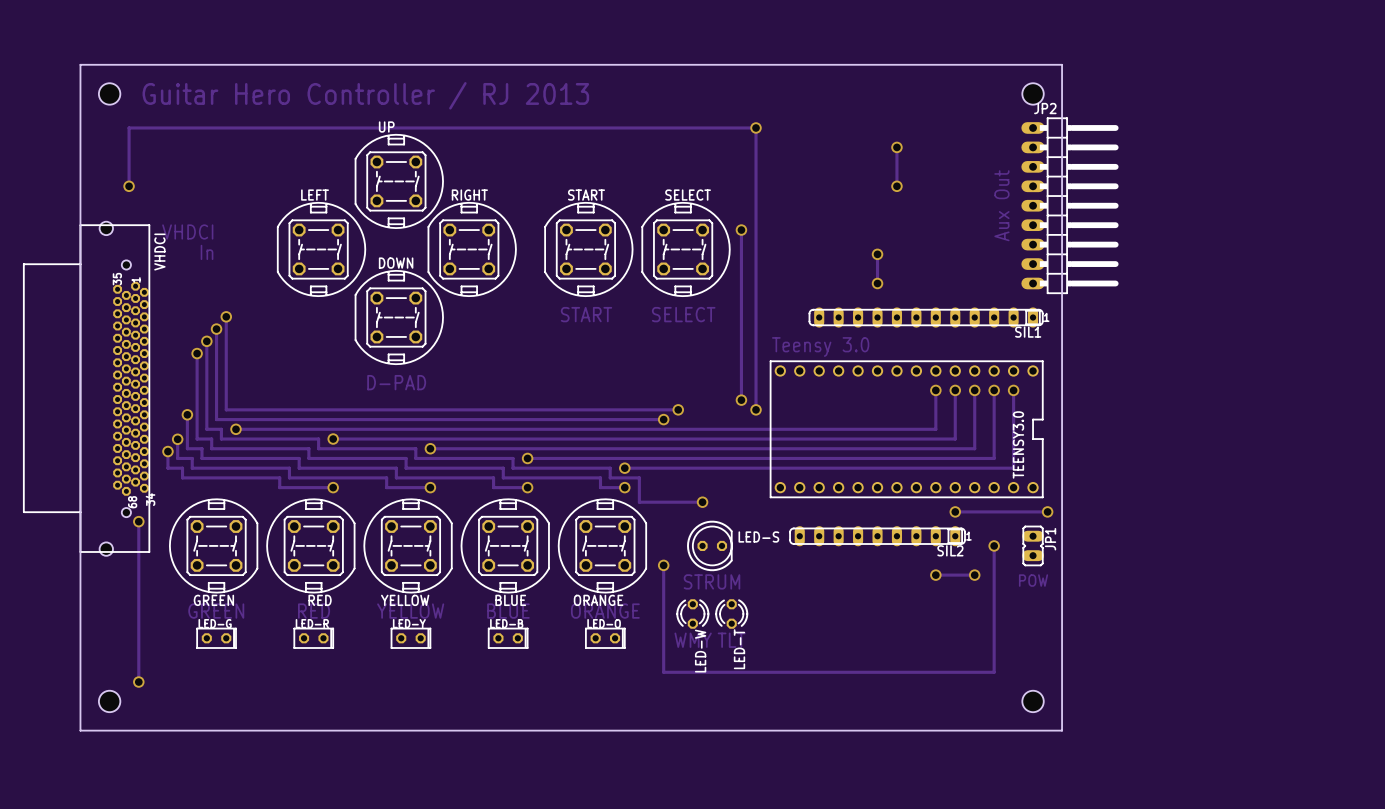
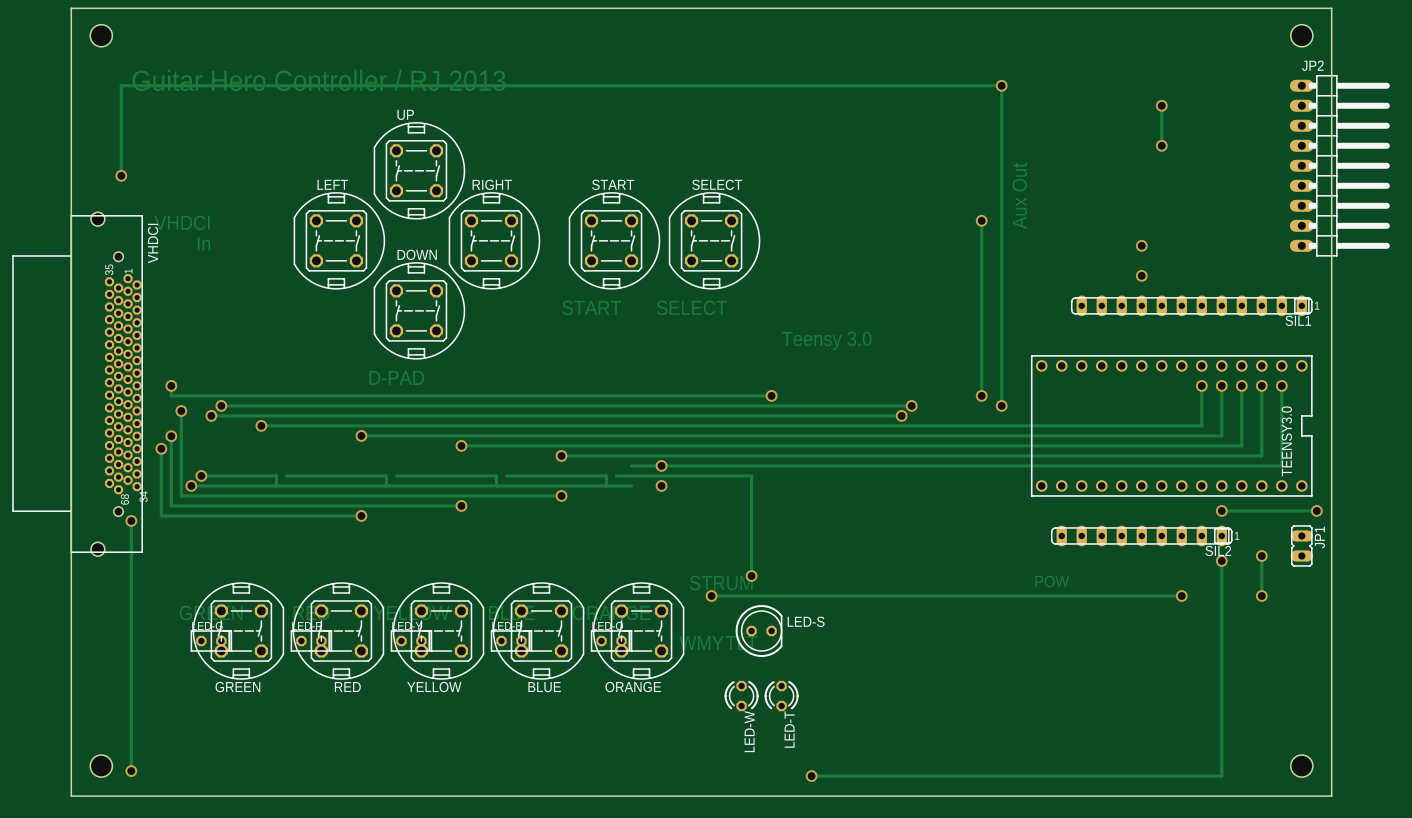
hole: none -> (1301, 35)
board edge: (80, 64) (1062, 64) (1062, 730) (80, 730) -> (71, 50) (71, 8) (1331, 8) (1331, 796) (71, 796) (71, 736)
hole position: (109, 93) -> (101, 35)
hole: (1033, 93) -> none
via: none -> (1001, 85)
track: none -> (1161, 105) (1161, 145)
via: none -> (1161, 105)
track: (129, 127) (756, 127) (756, 409) -> (121, 115) (121, 85) (1001, 85) (1001, 405)
via: (756, 127) -> none
track: (896, 147) (896, 186) -> none
via: (896, 147) -> none
via: none -> (1161, 145)
UP position: (399, 181) -> (419, 170)
via: (896, 186) -> none
JP2 position: (1069, 205) -> (1339, 165)
track: (741, 230) (741, 400) -> none
via: (741, 230) -> none
track: none -> (981, 220) (981, 395)
via: none -> (981, 220)
LEFT position: (321, 249) -> (339, 240)
RIGHT position: (472, 249) -> (494, 240)
START position: (588, 249) -> (614, 240)
SELECT position: (686, 249) -> (714, 240)
track: (877, 254) (877, 283) -> none
via: (877, 254) -> none
via: none -> (1141, 245)
via: (877, 283) -> none
via: none -> (1141, 275)
track: (226, 316) (226, 409) -> none
via: (226, 316) -> none
DOWN position: (399, 317) -> (419, 310)
SIL1 position: (926, 317) -> (1191, 305)
track: (216, 329) (216, 419) -> none
via: (216, 329) -> none
track: (206, 341) (206, 429) (221, 429) (221, 439) (318, 439) (318, 448) (415, 448) (415, 458) (513, 458) (513, 468) (610, 468) (610, 477) -> none
via: (206, 341) -> none
track: (197, 353) (197, 439) (211, 439) (211, 448) (308, 448) (308, 458) (406, 458) (406, 468) (503, 468) (503, 477) -> none
via: (197, 353) -> none
track: none -> (171, 385) (171, 395) (771, 395)
via: none -> (171, 385)
track: (935, 390) (935, 429) -> (1201, 385) (1201, 425) (951, 425)
via: (935, 390) -> none
track: (955, 390) (955, 439) -> (1221, 385) (1221, 435) (971, 435)
via: (955, 390) -> none
track: (974, 390) (974, 448) -> (1241, 385) (1241, 445) (991, 445)
via: (974, 390) -> none
track: (994, 390) (994, 458) -> (1261, 385) (1261, 455) (1011, 455)
via: (994, 390) -> none
track: (1013, 390) (1013, 468) -> (1281, 385) (1281, 465) (1031, 465)
via: (1013, 390) -> none
via: none -> (1201, 385)
via: none -> (1221, 385)
via: none -> (1241, 385)
via: none -> (1261, 385)
via: none -> (1281, 385)
via: (741, 400) -> none
via: none -> (771, 395)
via: none -> (981, 395)
via: none -> (221, 405)
track: none -> (686, 405) (911, 405)
via: (678, 409) -> none
via: (756, 409) -> none
via: none -> (911, 405)
via: none -> (1001, 405)
via: none -> (211, 415)
track: none -> (671, 415) (901, 415)
via: (663, 419) -> none
via: none -> (901, 415)
track: (235, 429) (265, 429) -> none
via: (235, 429) -> none
via: none -> (261, 425)
TEENSY3.0 position: (906, 429) -> (1171, 425)
track: (333, 439) (362, 439) -> none
via: (333, 439) -> none
via: none -> (361, 435)
track: (187, 448) (201, 448) (201, 458) (299, 458) (299, 468) (396, 468) (396, 477) -> (181, 445) (181, 495) (561, 495)
track: (430, 448) (459, 448) -> none
via: (430, 448) -> none
via: none -> (461, 445)
track: (177, 458) (192, 458) (192, 468) (289, 468) (289, 477) -> (171, 455) (171, 505) (461, 505)
track: (527, 458) (556, 458) -> none
via: (527, 458) -> none
via: none -> (561, 455)
track: (167, 468) (182, 468) (182, 477) (206, 477) -> (161, 465) (161, 515) (361, 515)
via: (624, 468) -> none
via: none -> (661, 465)
via: none -> (201, 475)
track: (639, 477) (639, 502) (702, 502) -> (646, 475) (751, 475) (751, 575)
track: none -> (191, 485) (276, 485)
via: none -> (191, 485)
track: none -> (331, 485) (386, 485)
via: (333, 487) -> none
track: none -> (431, 485) (496, 485)
via: (430, 487) -> none
track: none -> (531, 485) (606, 485)
via: (527, 487) -> none
via: (624, 487) -> none
via: none -> (661, 485)
via: none -> (561, 495)
via: (702, 502) -> none
via: none -> (461, 505)
track: (955, 511) (1047, 511) -> none
via: (955, 511) -> none
via: (1047, 511) -> none
track: none -> (1221, 510) (1316, 510)
via: none -> (1221, 510)
via: none -> (1316, 510)
via: none -> (361, 515)
SIL2 position: (877, 536) -> (1141, 535)
GREEN position: (213, 545) -> (238, 631)
RED position: (310, 545) -> (338, 631)
YELLOW position: (408, 545) -> (438, 631)
BLUE position: (505, 545) -> (538, 631)
ORANGE position: (602, 545) -> (638, 631)
LED-S position: (709, 545) -> (759, 631)
track: (994, 545) (994, 672) (663, 672) (663, 565) -> none
via: (994, 545) -> none
JP1 position: (1033, 545) -> (1301, 545)
track: none -> (1261, 555) (1261, 595)
via: none -> (1261, 555)
track: none -> (1221, 560) (1221, 776) (811, 776)
via: none -> (1221, 560)
via: (663, 565) -> none
via: none -> (751, 575)
track: (935, 575) (974, 575) -> none
via: (935, 575) -> none
via: (974, 575) -> none
track: none -> (711, 595) (1181, 595)
via: none -> (711, 595)
via: none -> (1181, 595)
via: none -> (1261, 595)
LED-W position: (692, 613) -> (741, 696)
LED-T position: (731, 613) -> (781, 696)
track: none -> (131, 686) (131, 771)
via: (138, 682) -> none
hole position: (109, 701) -> (101, 766)
hole: (1033, 701) -> none
hole: none -> (1301, 766)
via: none -> (131, 771)
via: none -> (811, 776)

